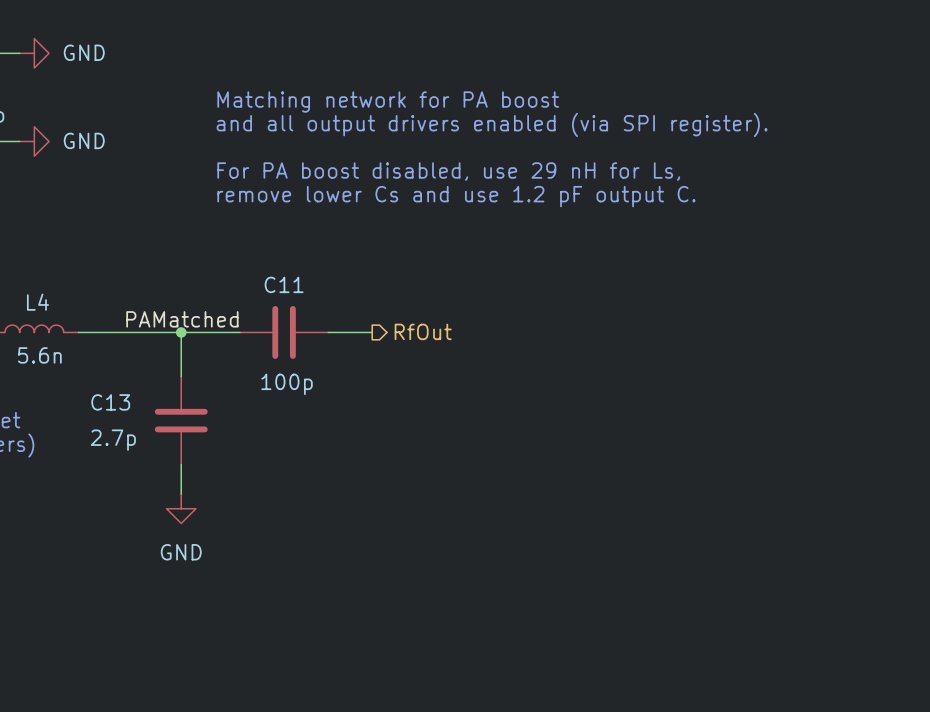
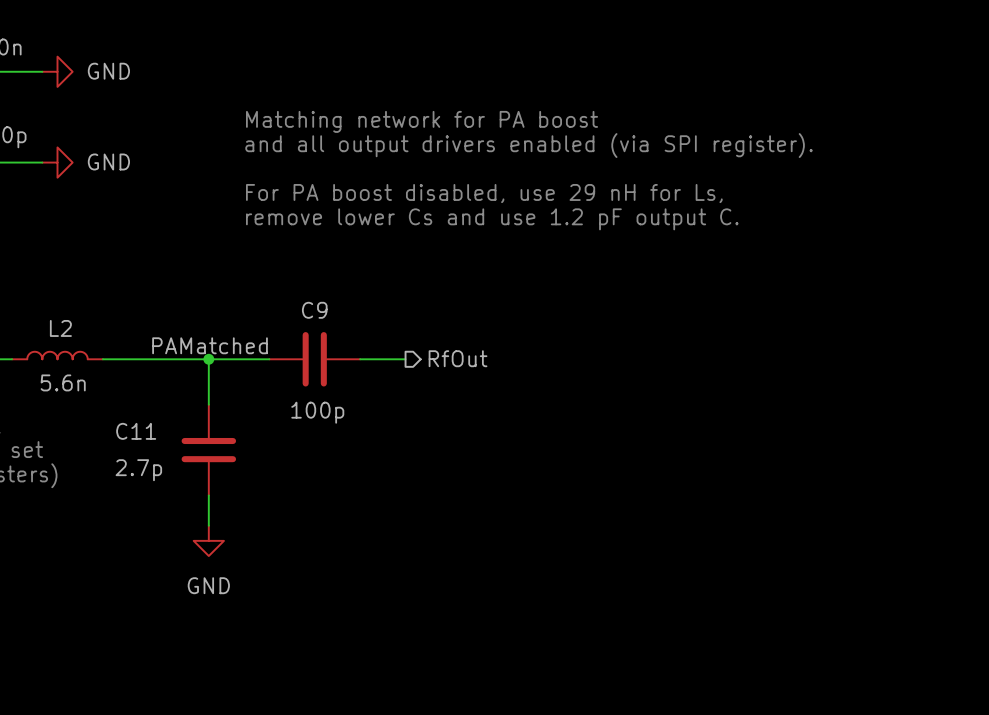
C11 name: C11 (284, 284) -> C9 (314, 310)
L4 name: L4 (37, 302) -> L2 (60, 328)
C13 name: C13 (110, 402) -> C11 (136, 431)

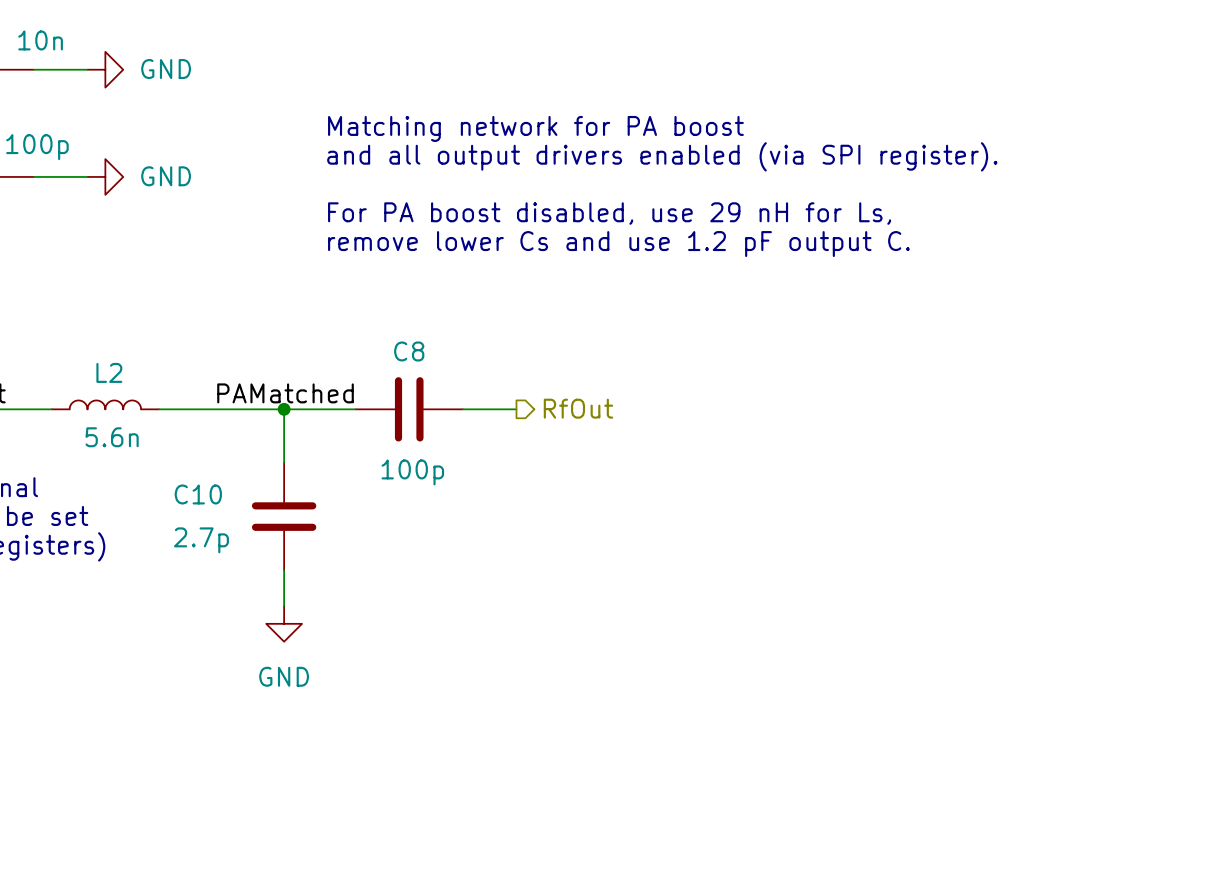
C9 name: C9 (314, 310) -> C8 (409, 351)
C11 name: C11 (136, 431) -> C10 (198, 494)

